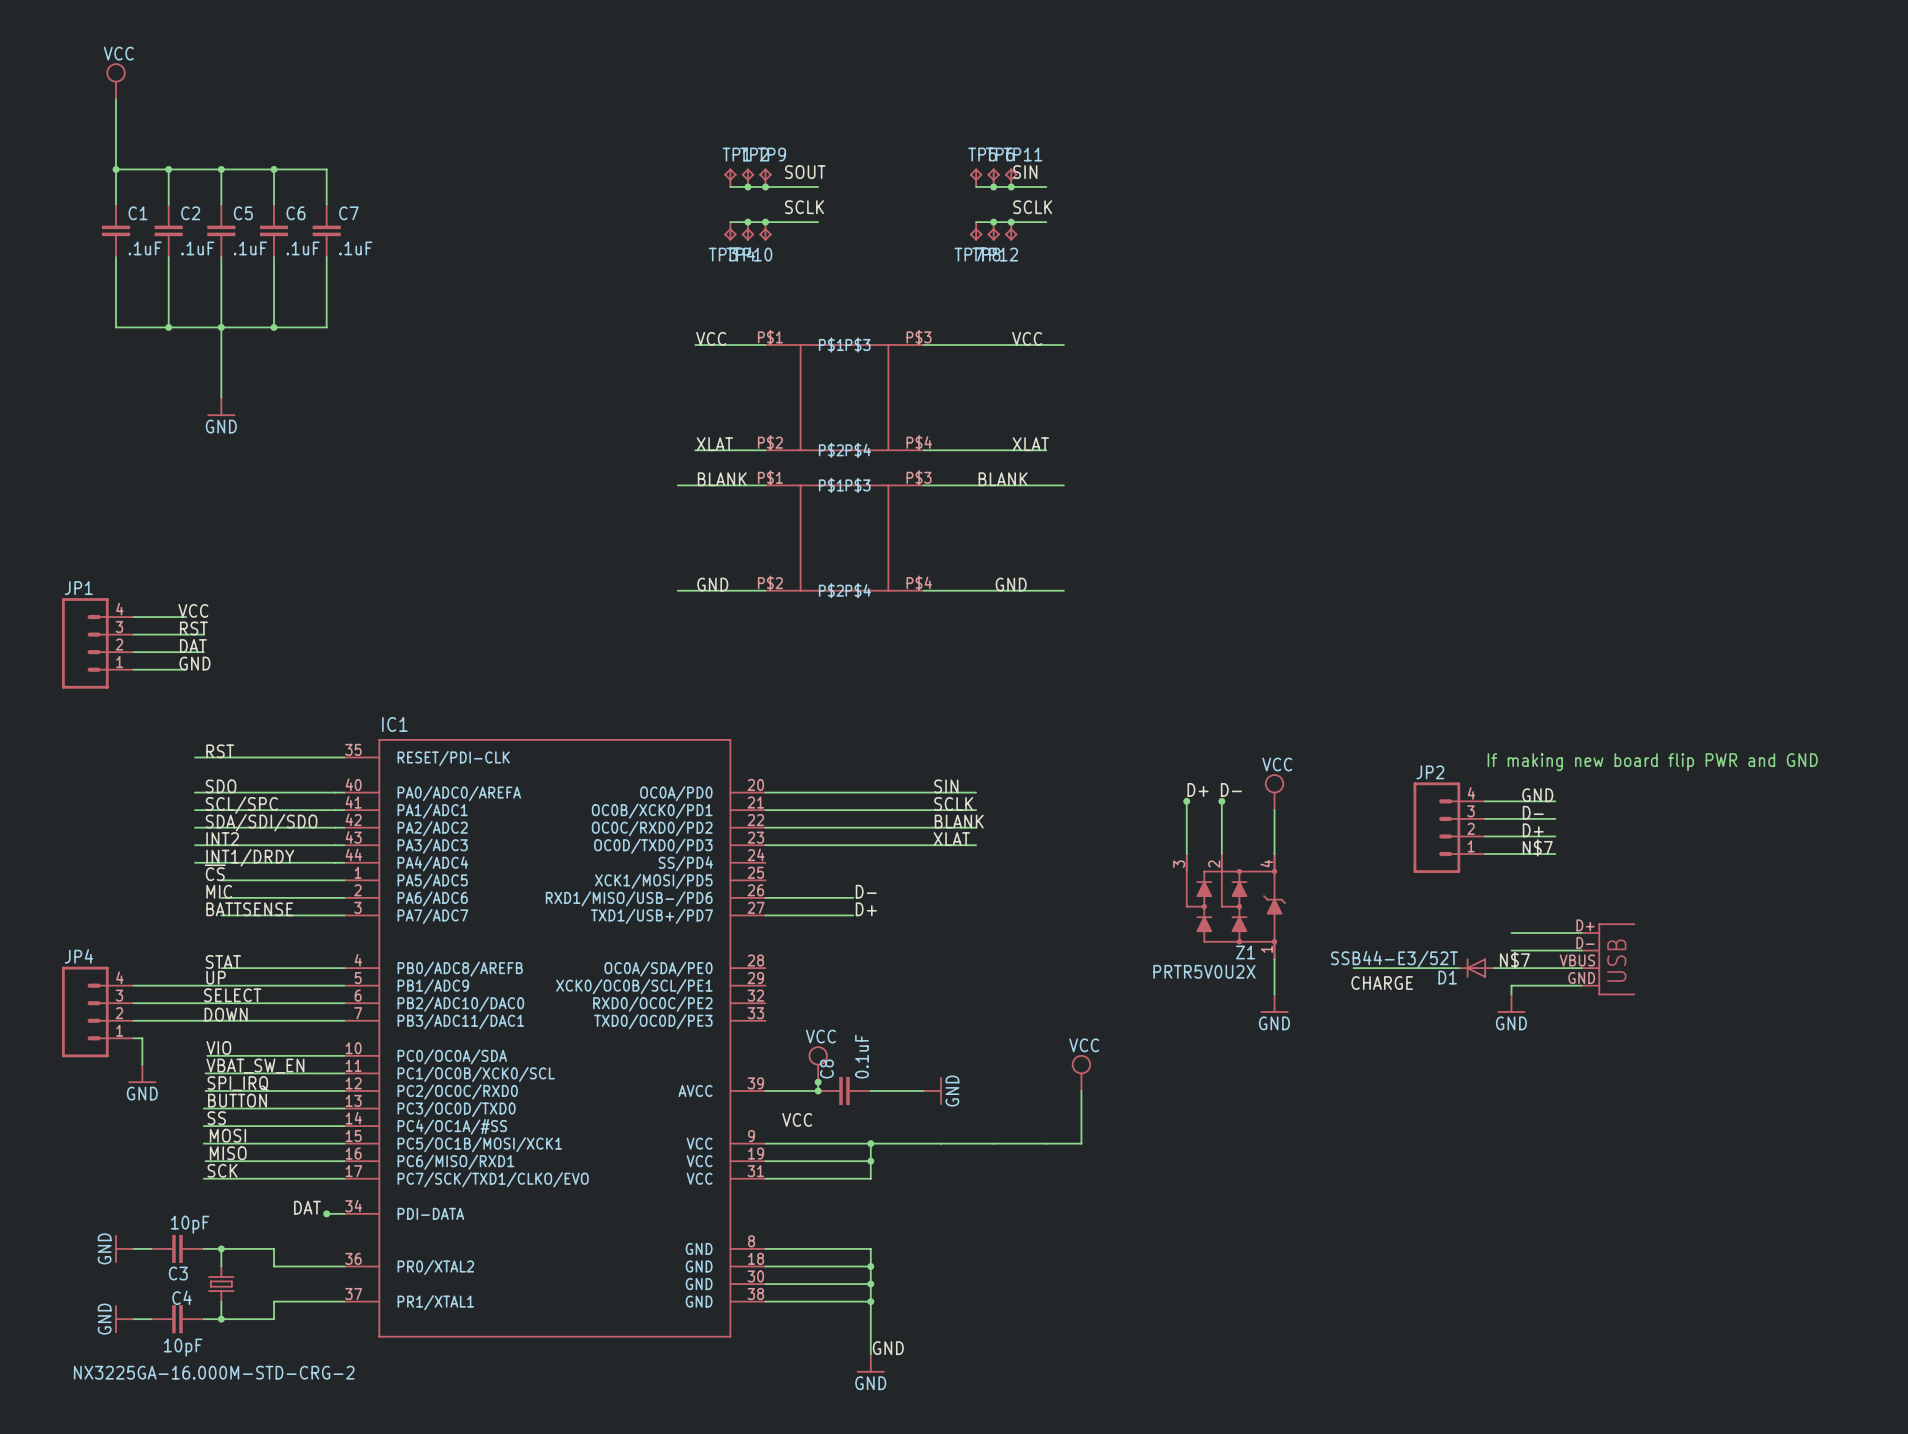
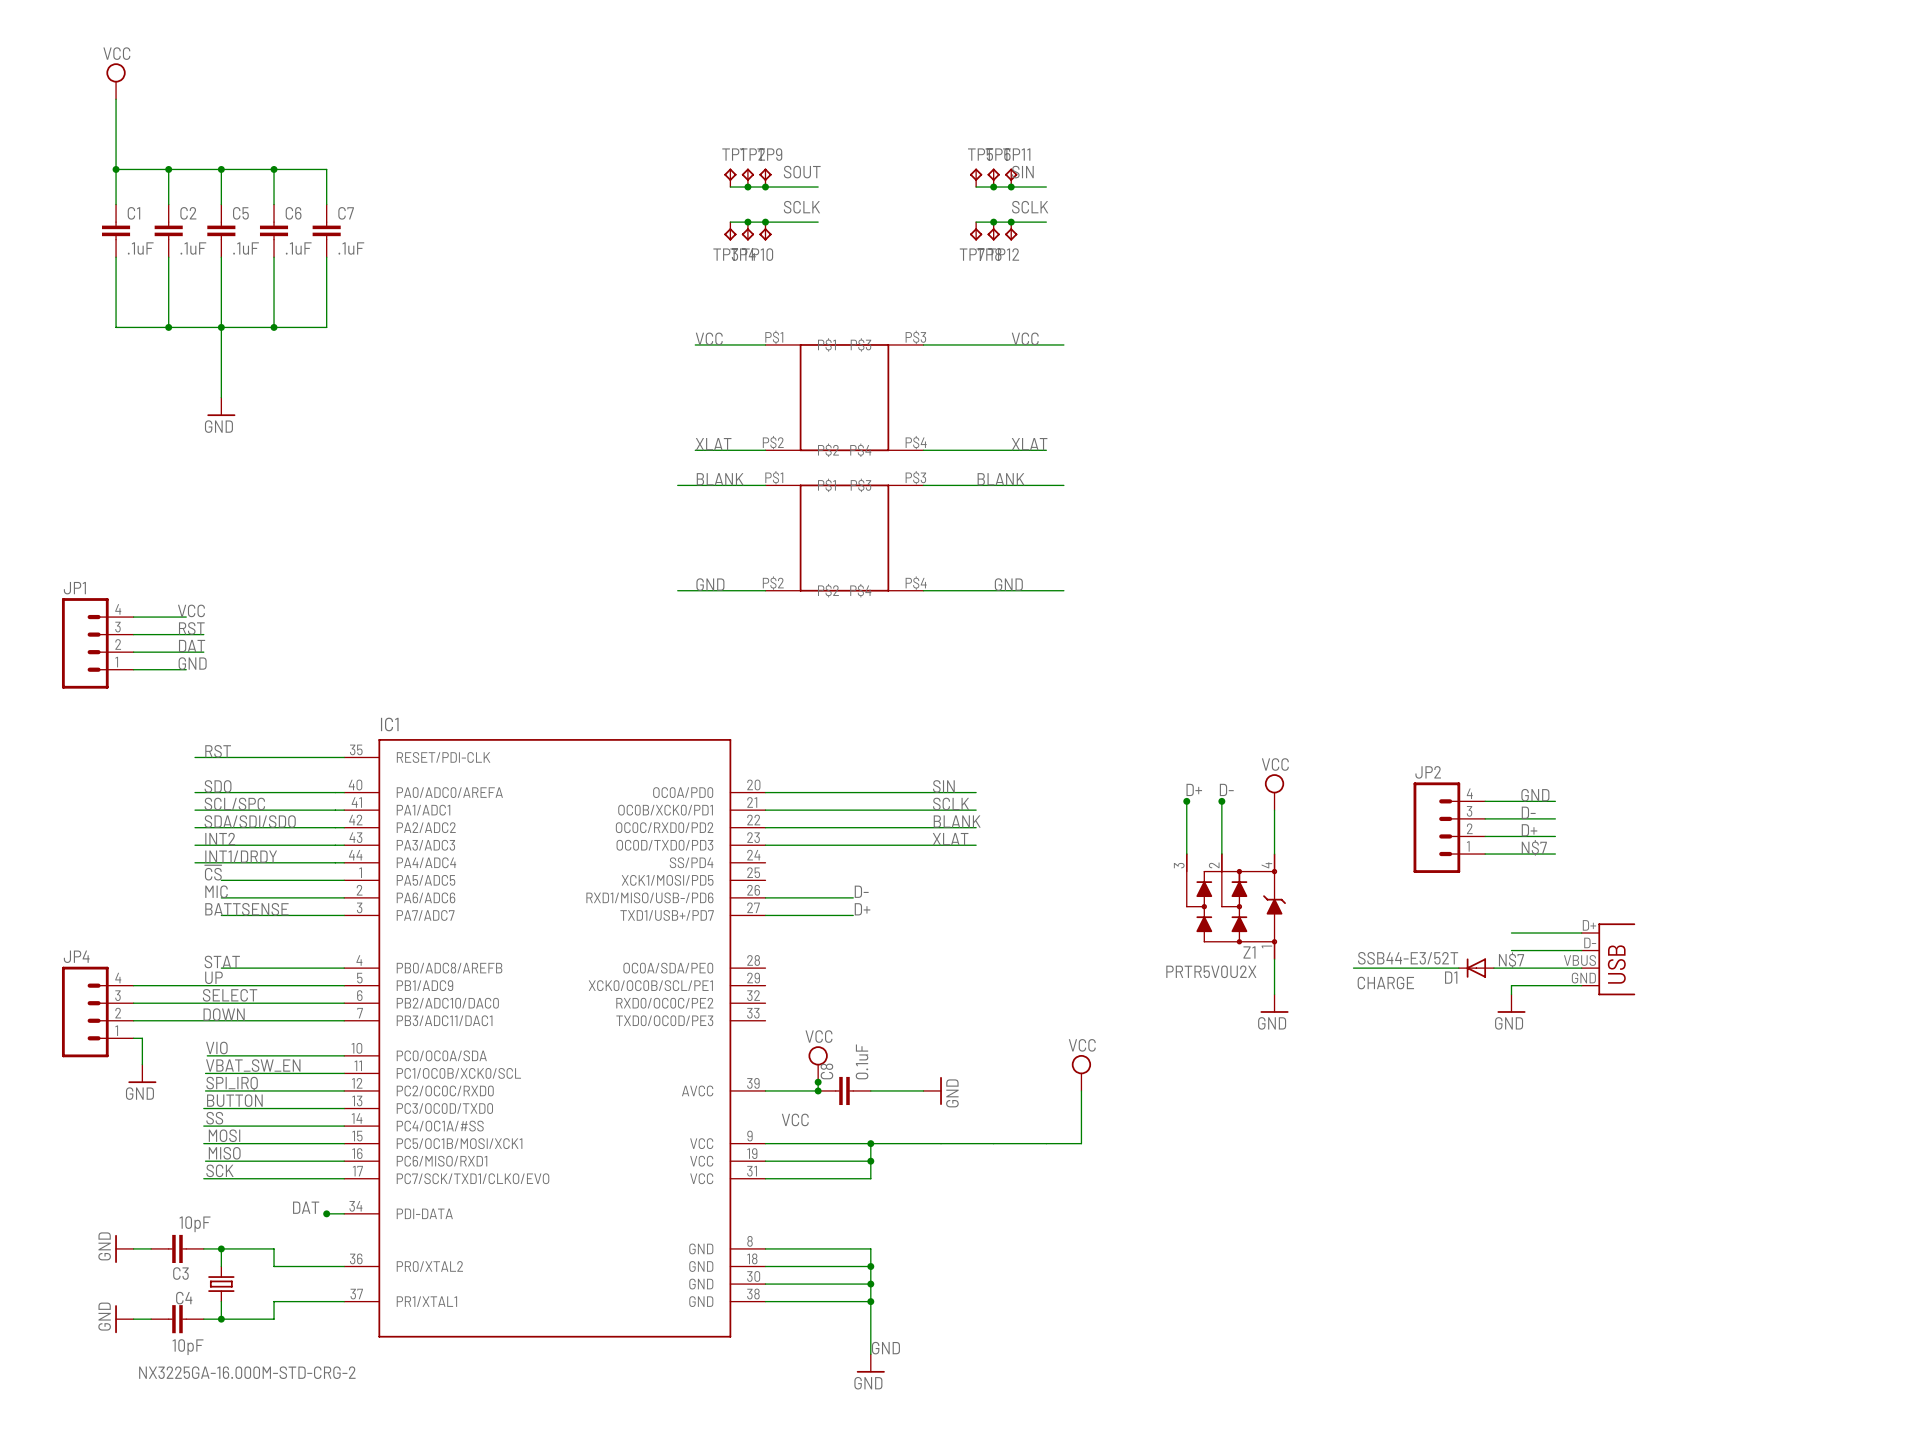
text: If making new board flip PWR and GND (1652, 762) -> none

